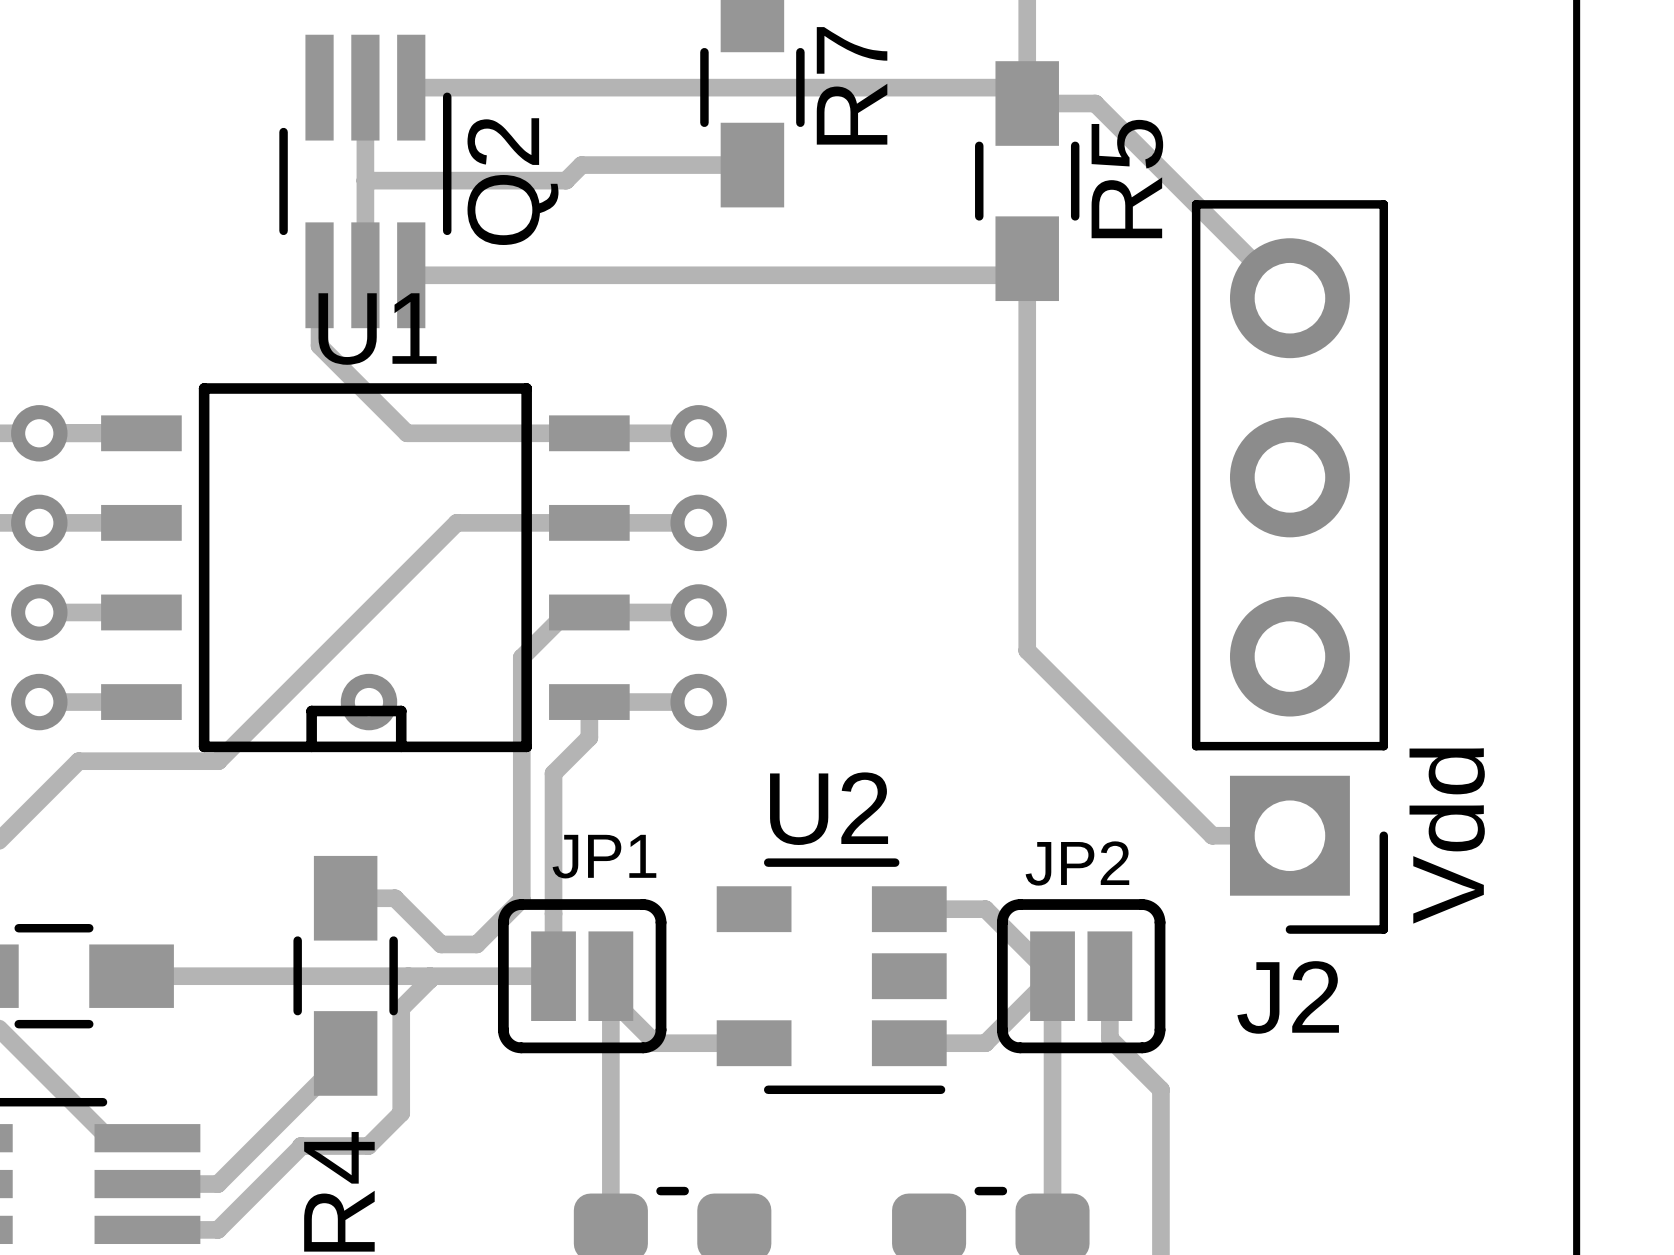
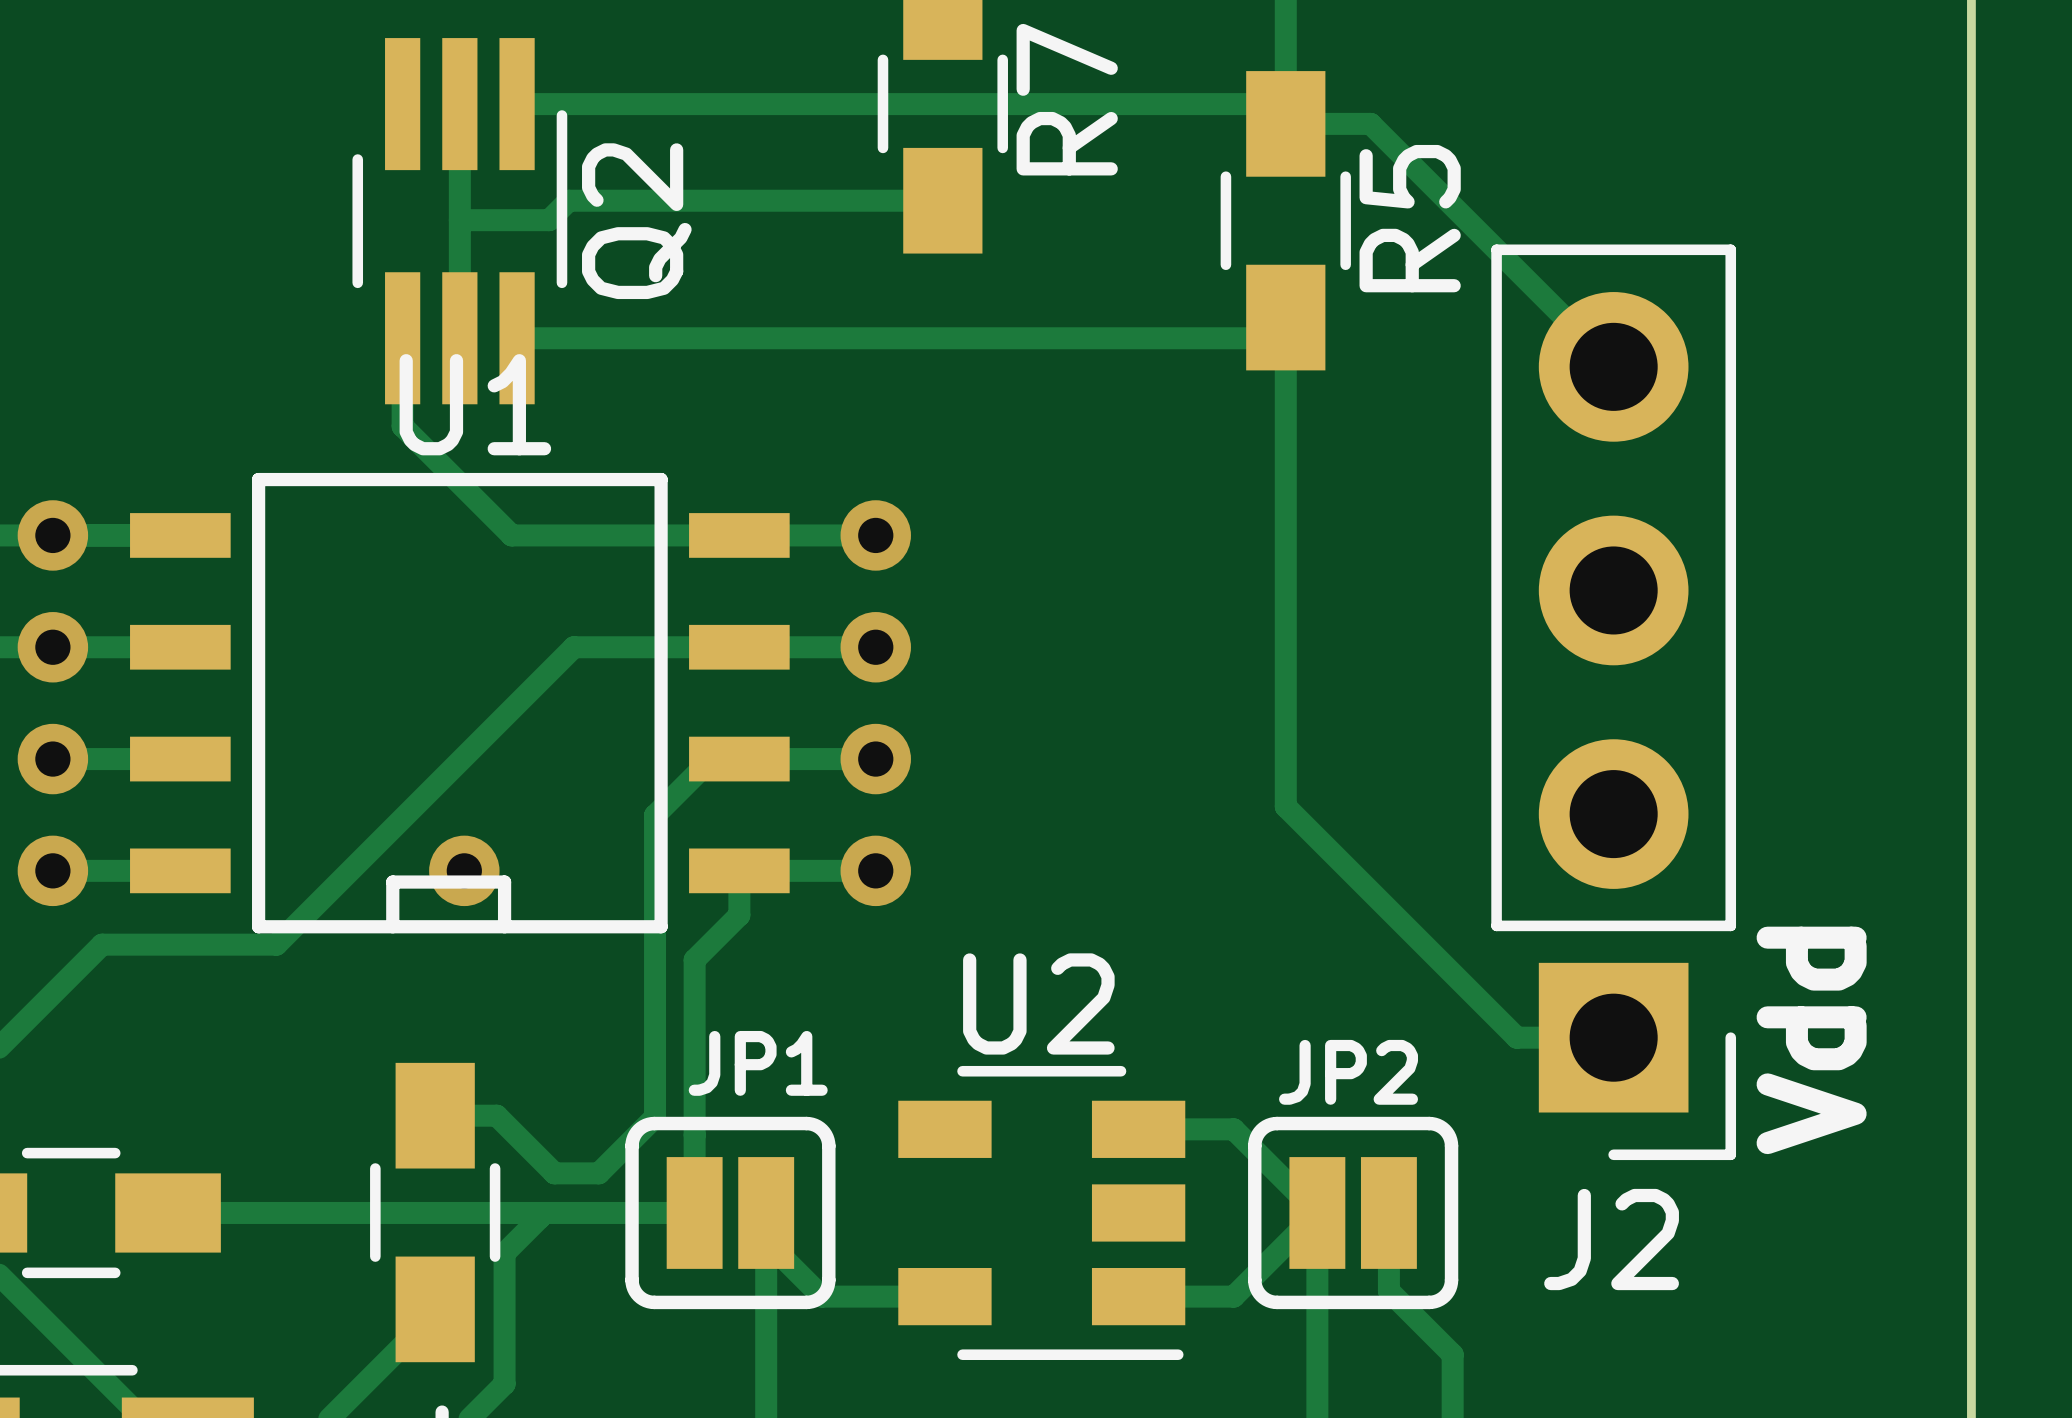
track: (581, 165) (566, 180) (437, 180) -> (729, 200) (568, 200) (549, 220)

